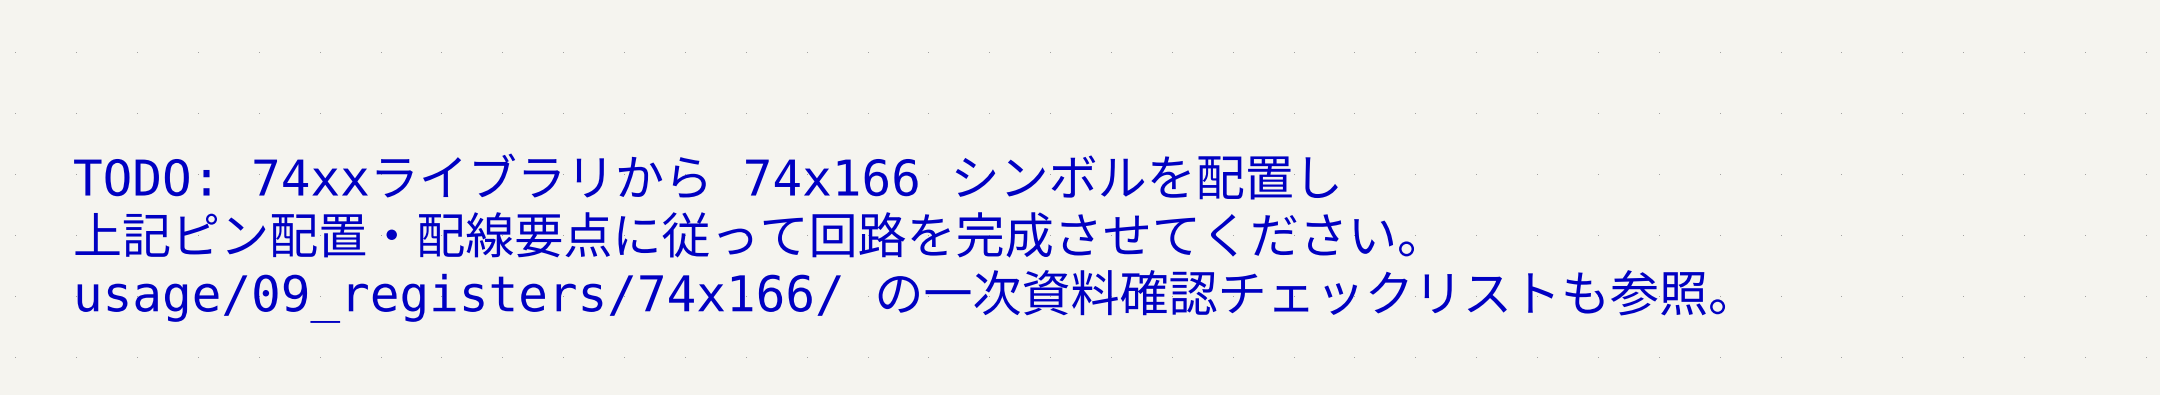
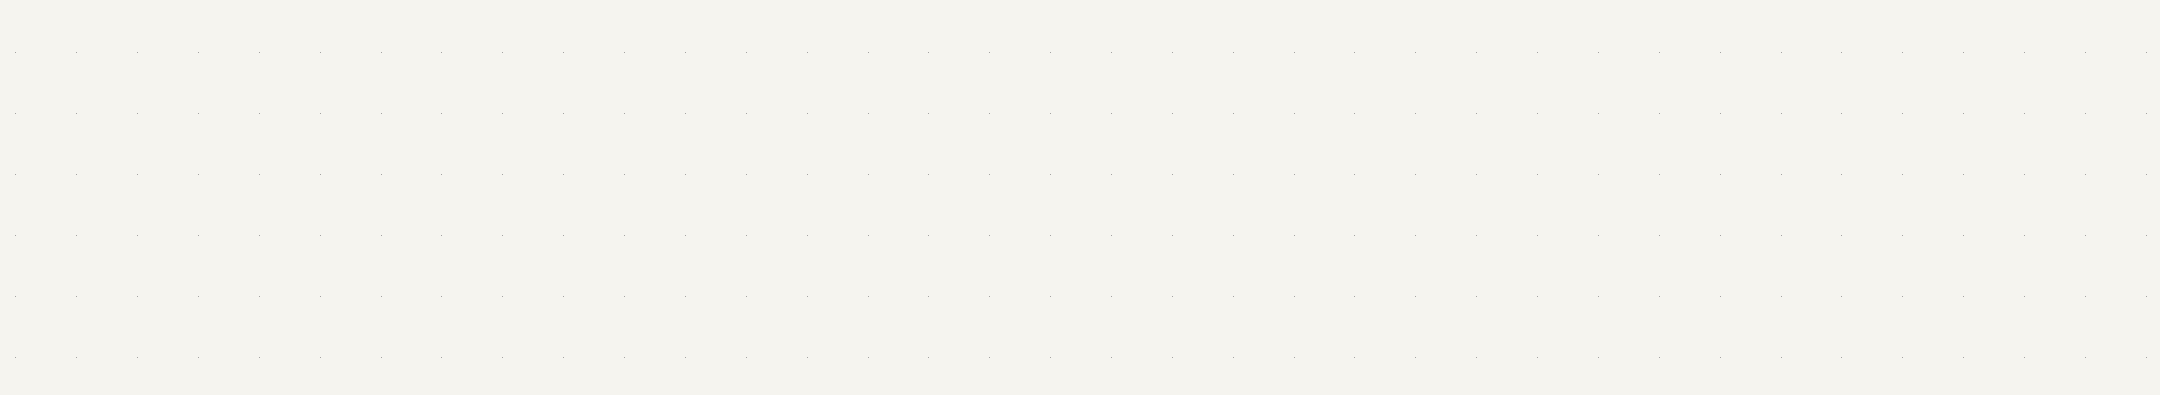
text: TODO: 74xxライブラリから 74x166 シンボルを配置し (705, 176) -> none
text: 上記ピン配置・配線要点に従って回路を完成させてください。 (744, 234) -> none
text: usage/09_registers/74x166/ の一次資料確認チェックリストも参照。 (901, 296) -> none

